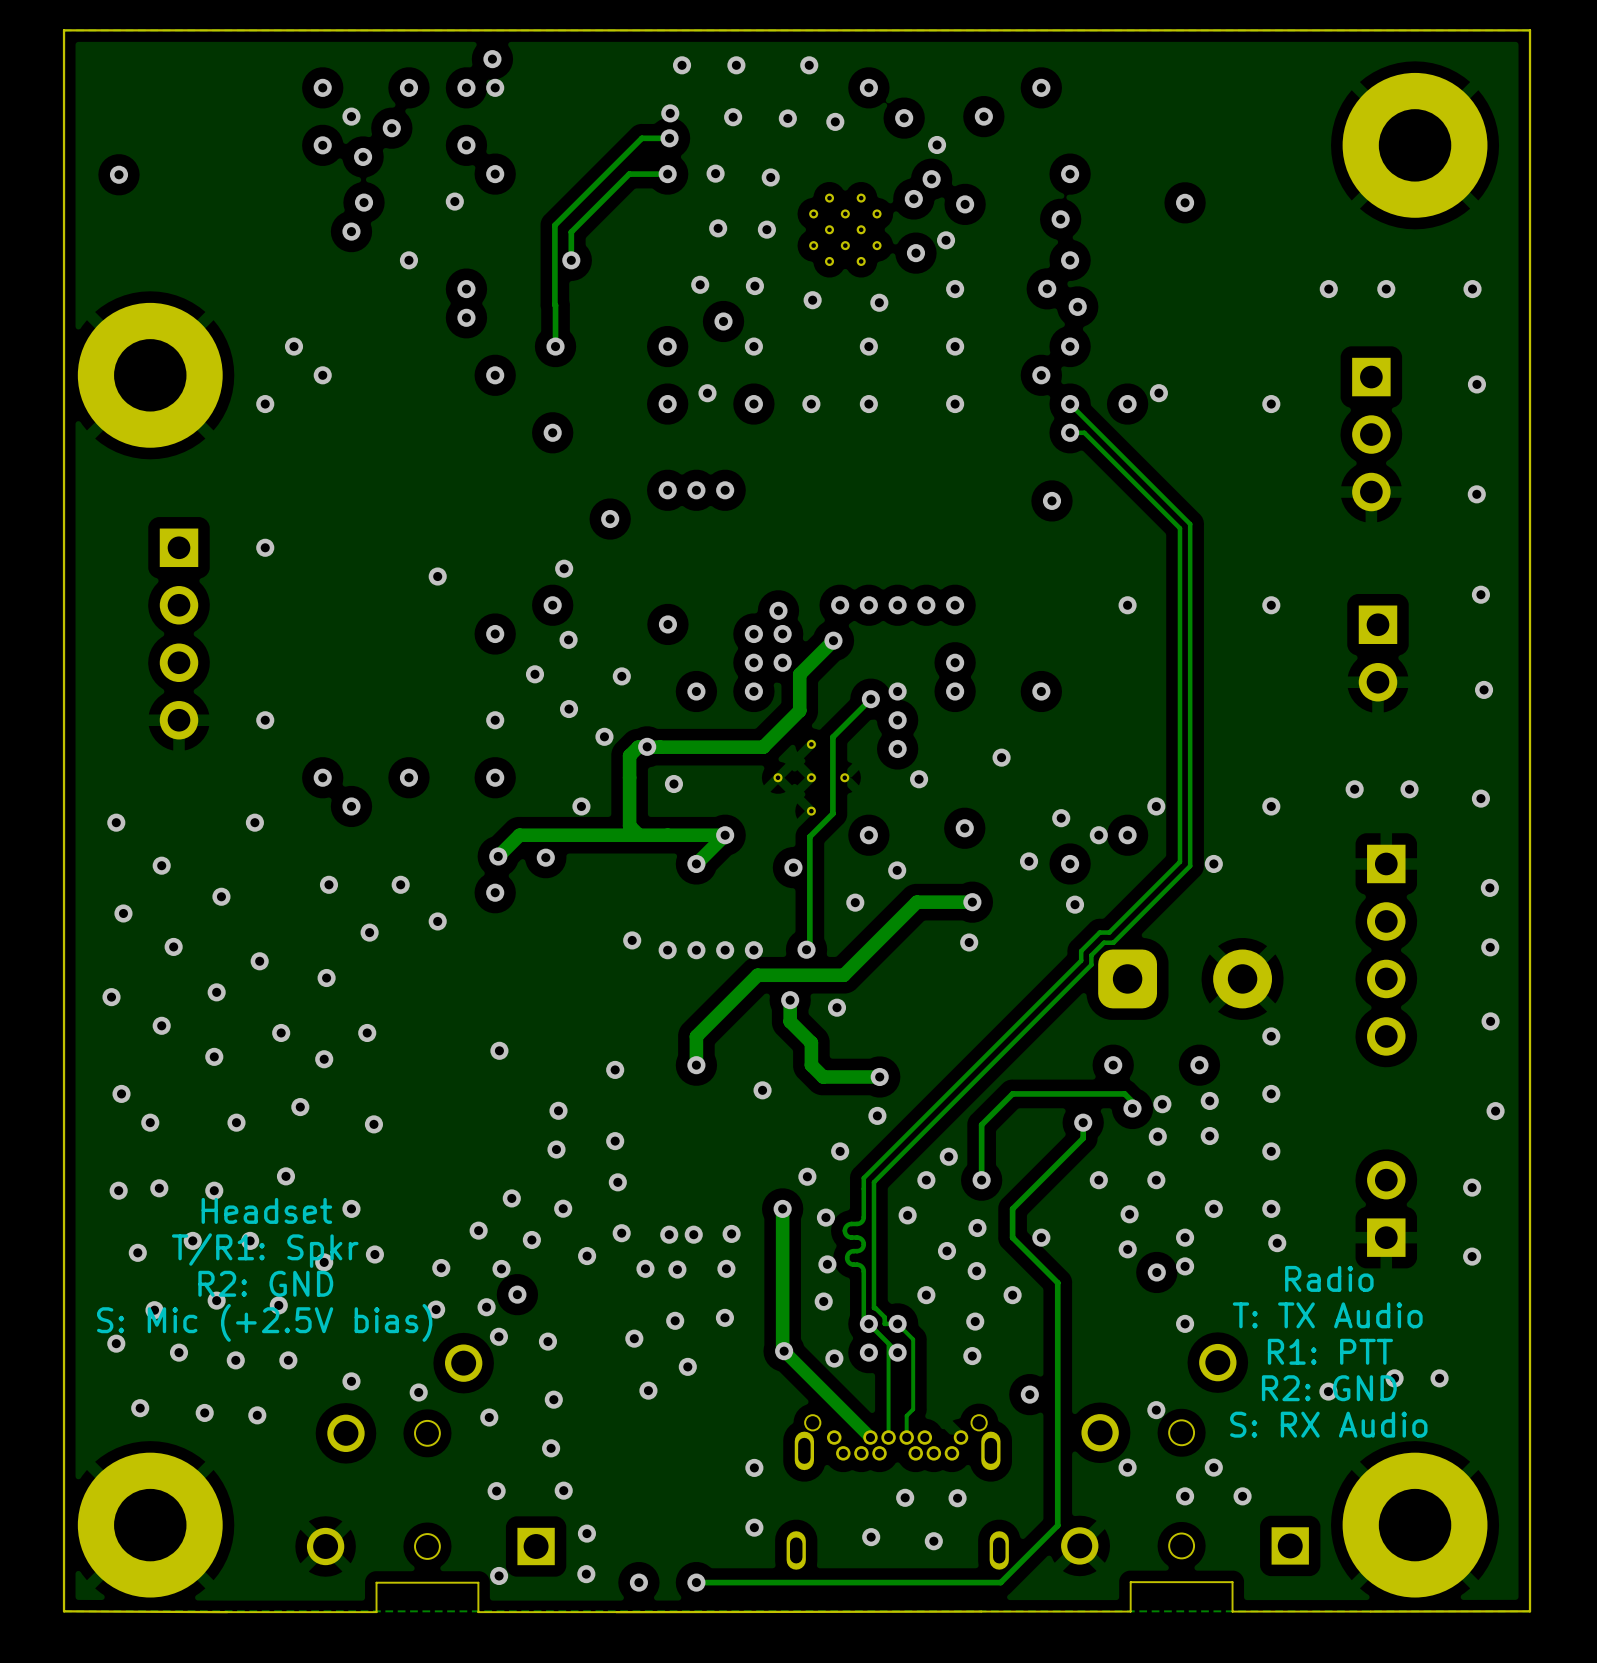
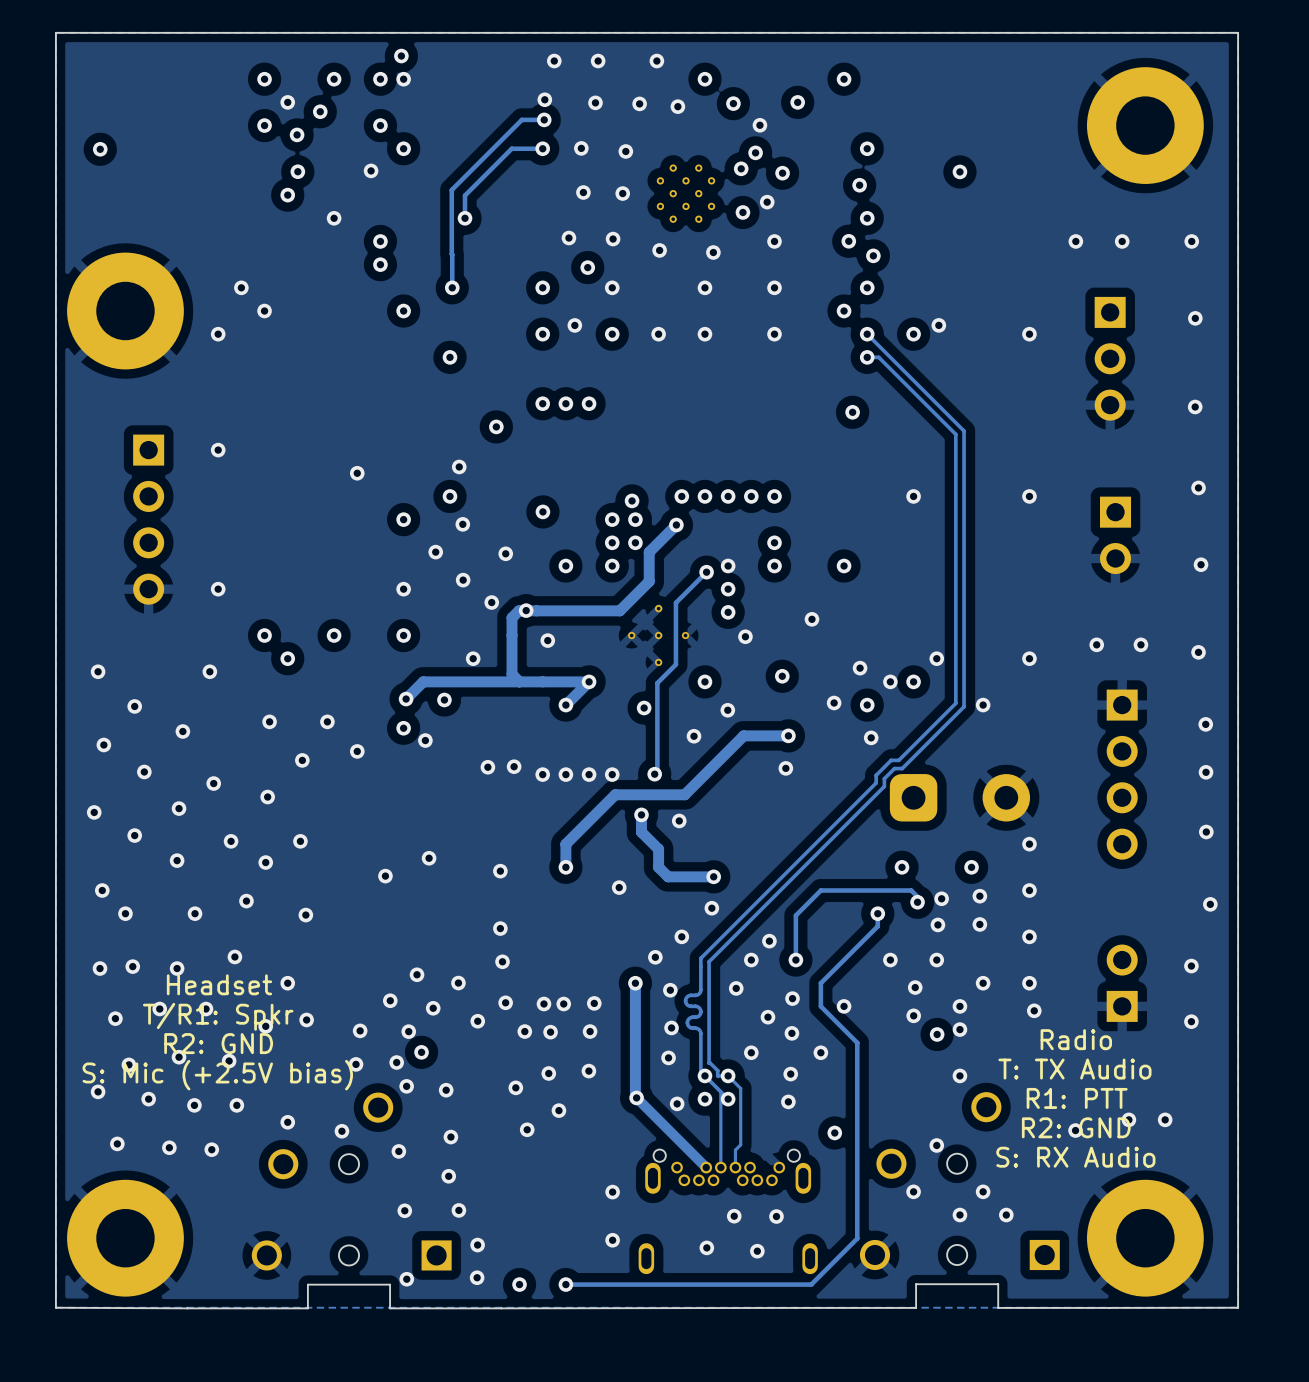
via: none -> (425, 740)
via: none -> (487, 767)
via: (499, 1050) -> none
via: none -> (429, 858)
via: none -> (385, 876)
via: (558, 1110) -> none
via: (556, 1149) -> none

